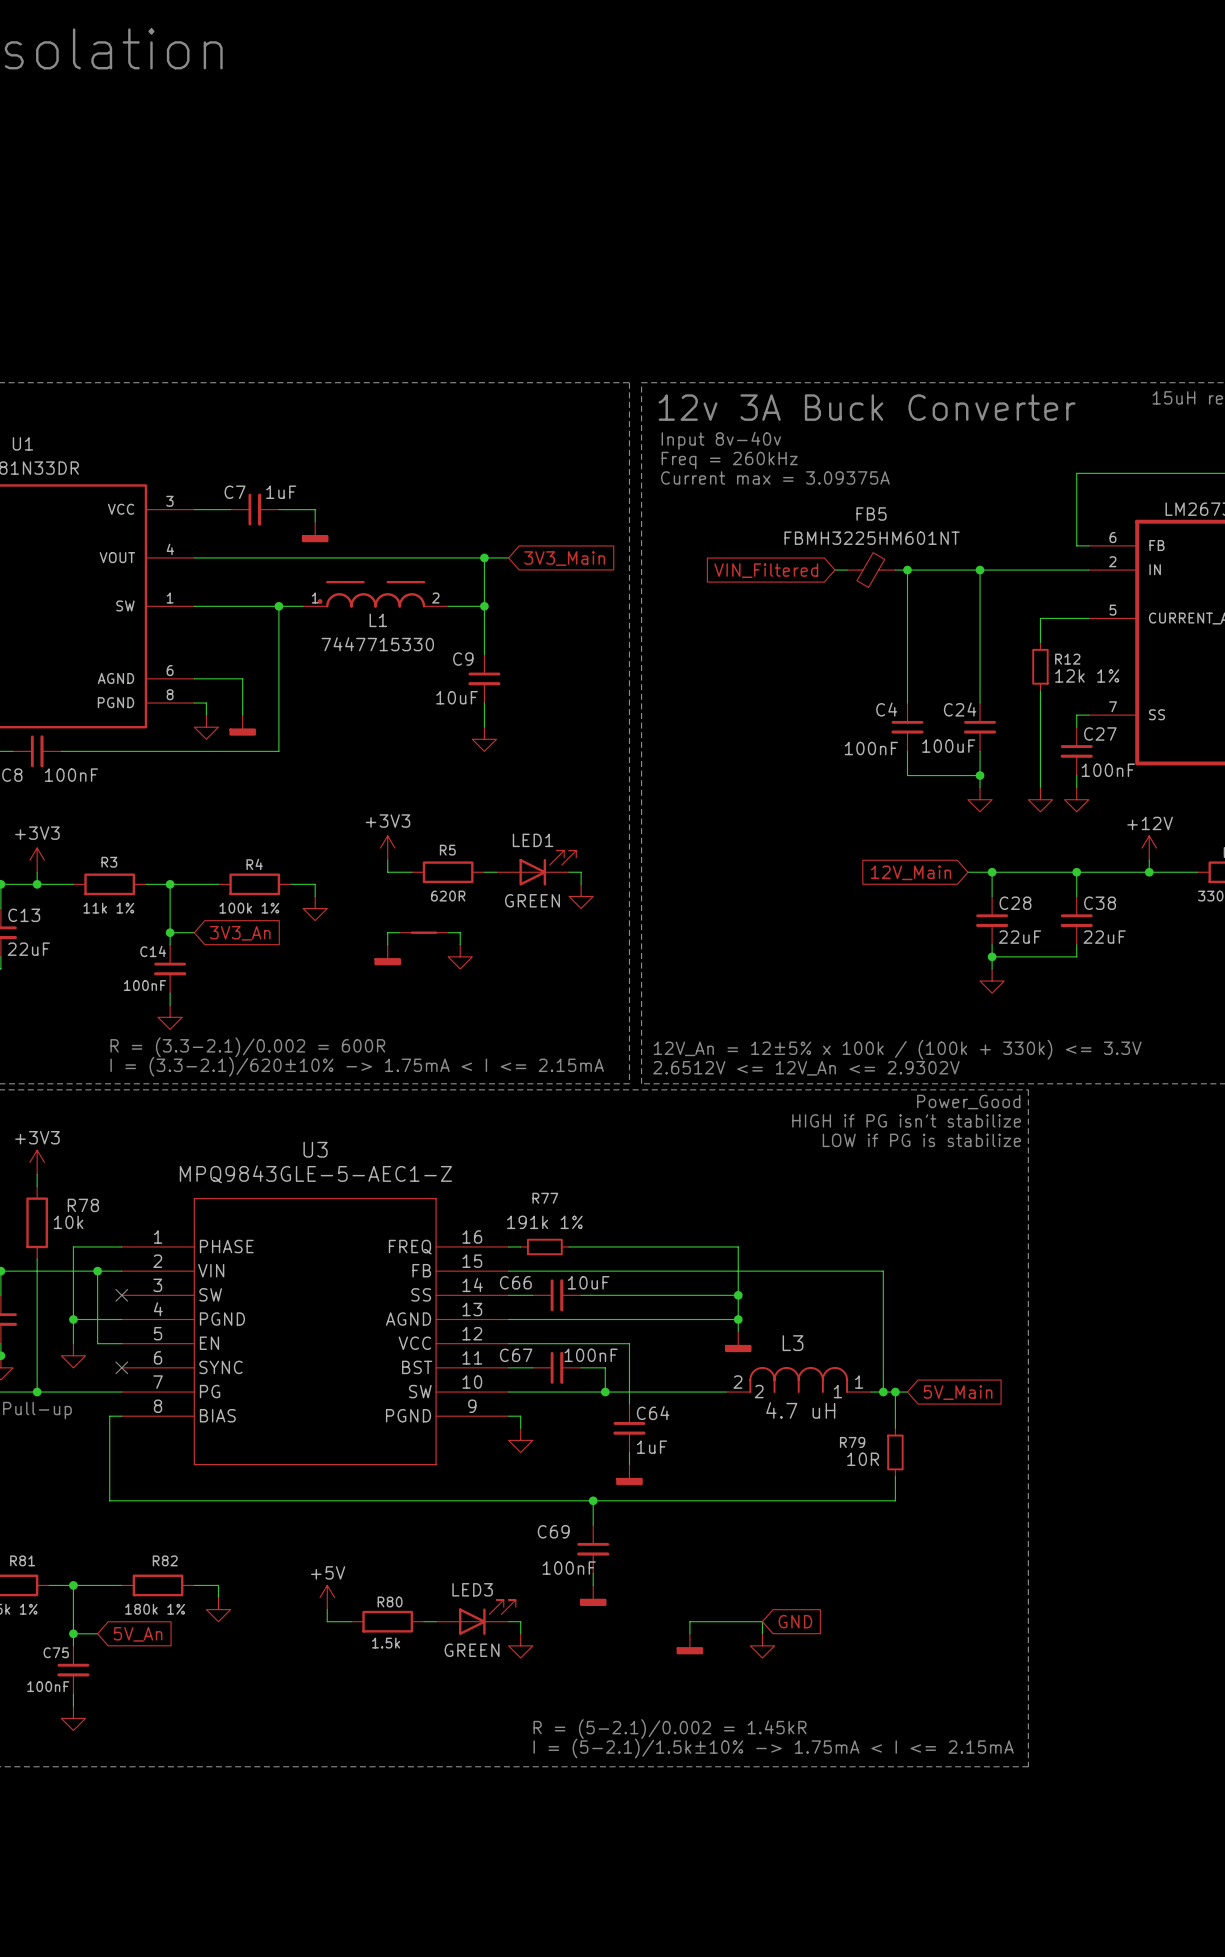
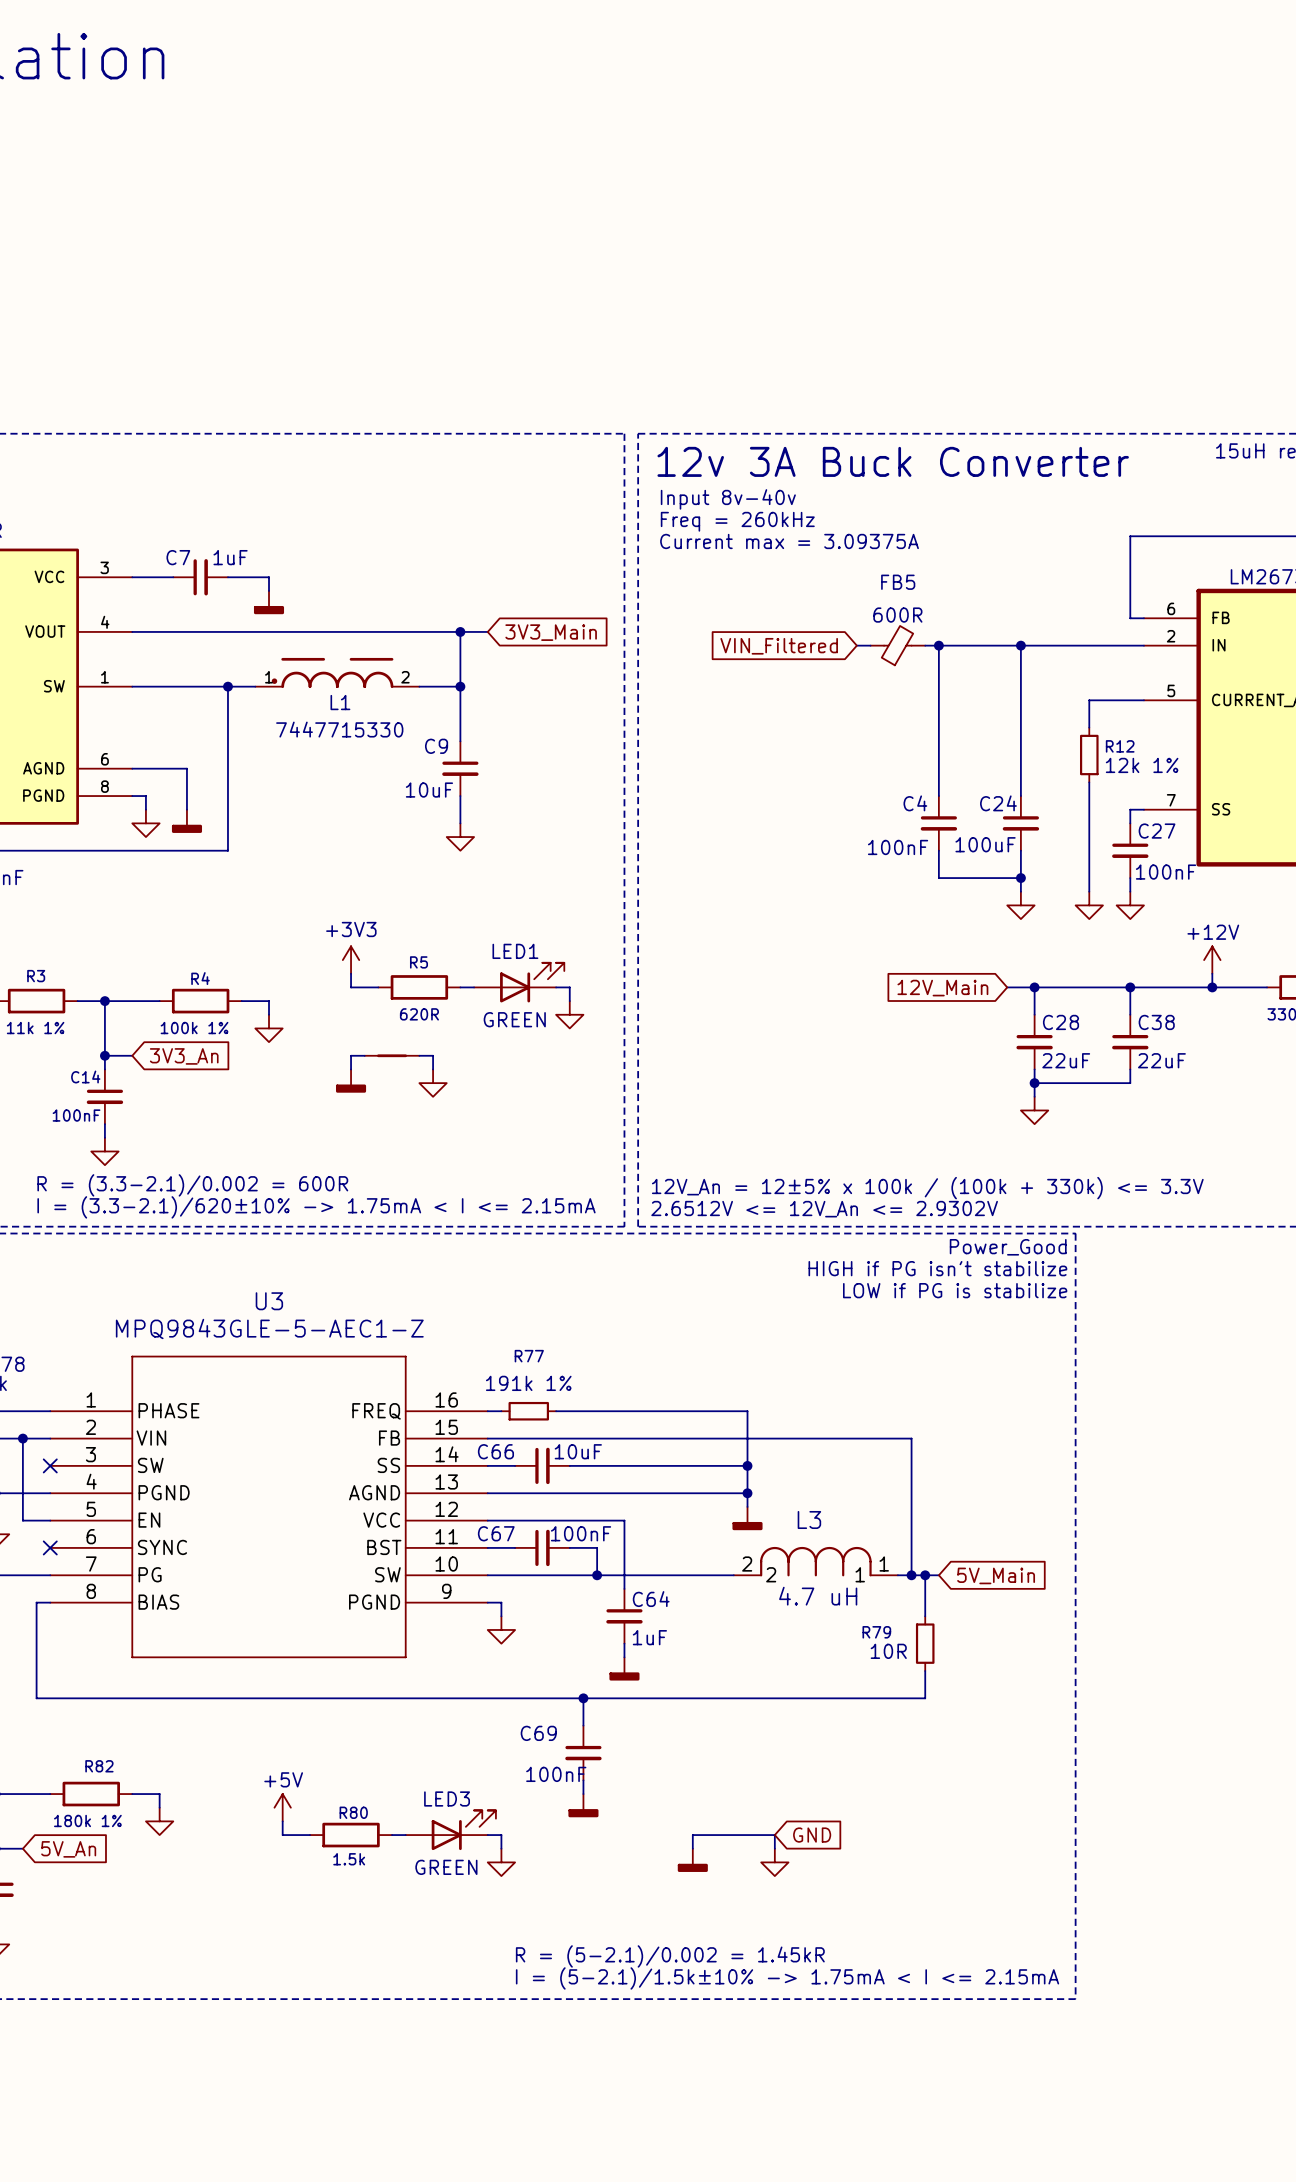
FB5 value: FBMH3225HM601NT (872, 538) -> 600R (897, 615)

